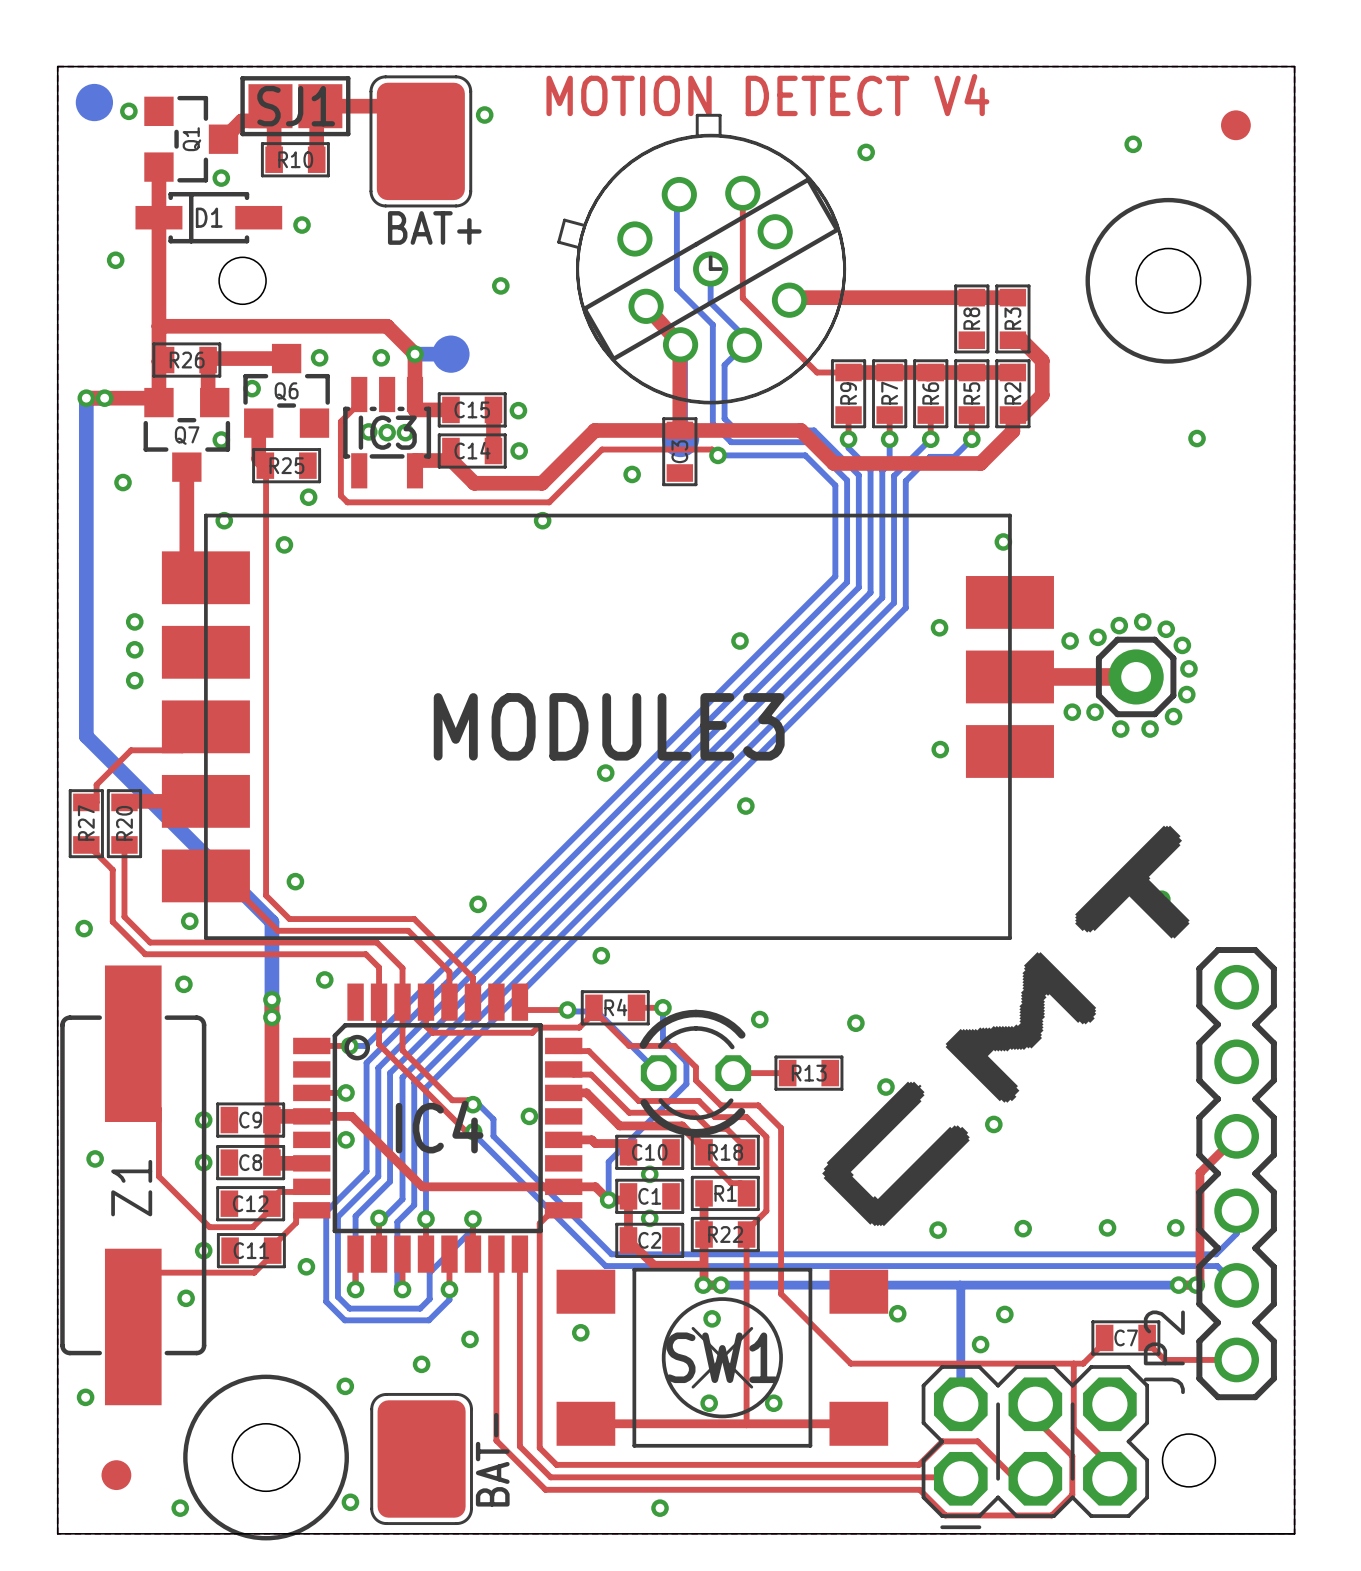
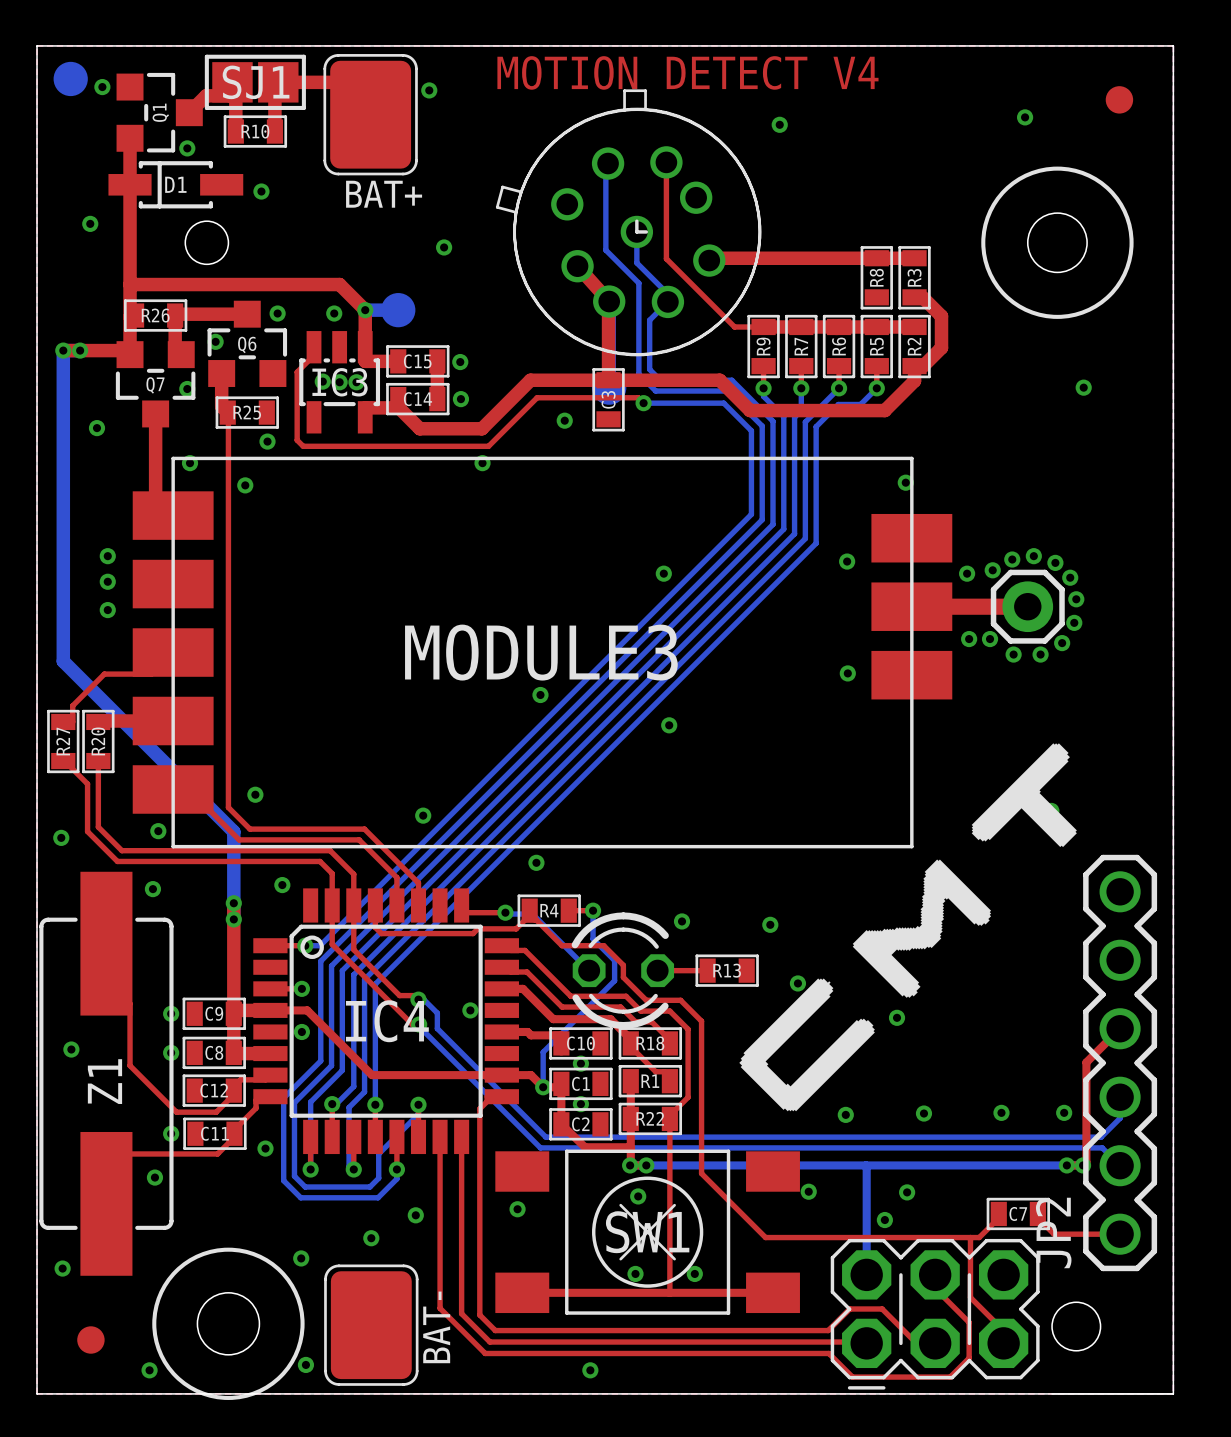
line: (808, 179) (584, 308) (613, 359) (837, 229) (808, 179) -> none

